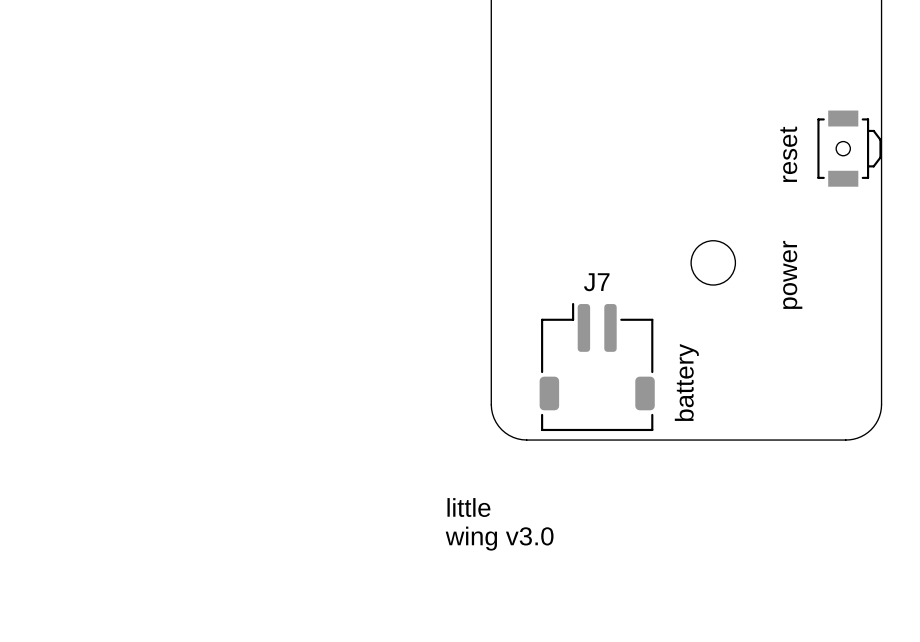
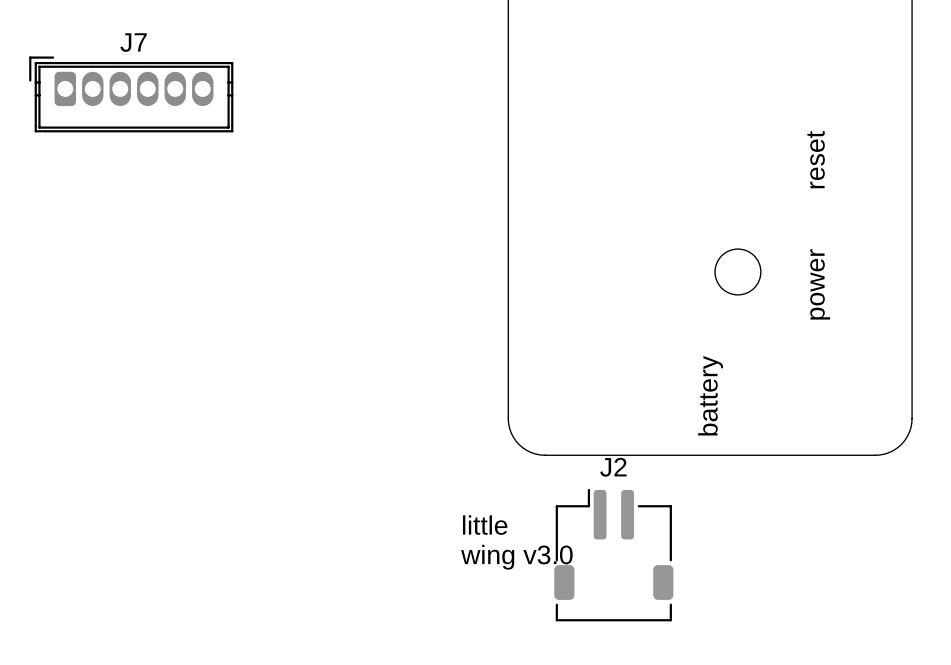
part: (849, 148) -> none
J7 footprint: [539, 302, 655, 432] -> [29, 56, 234, 133]
J2: none -> (613, 555)

